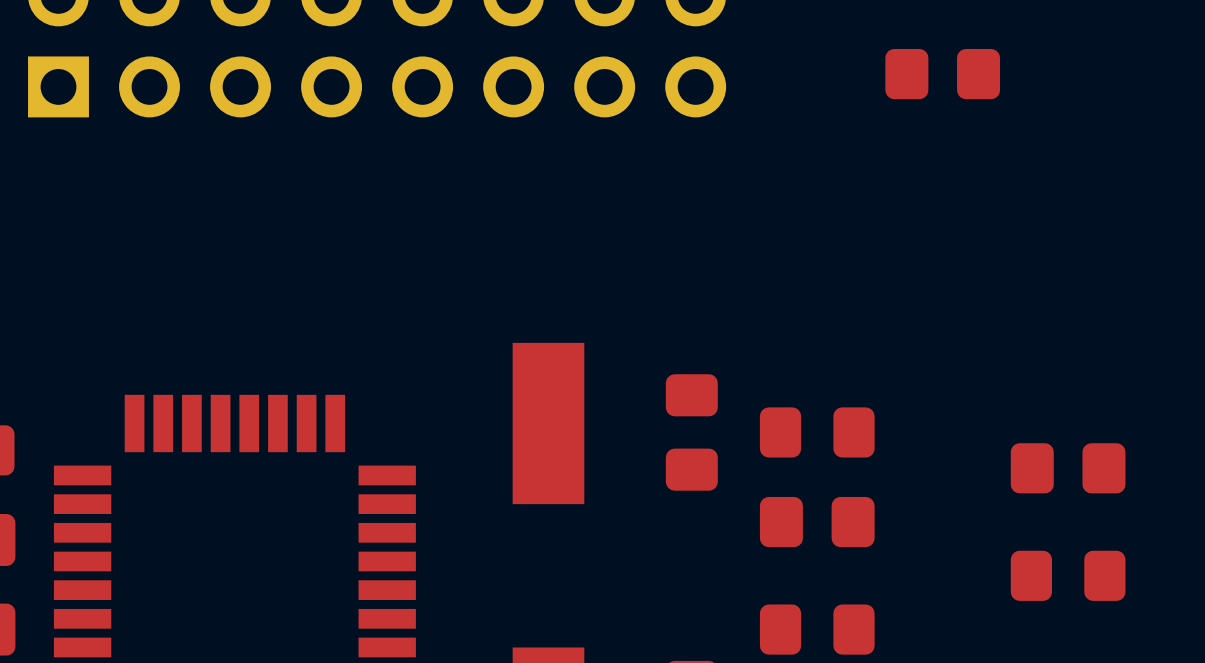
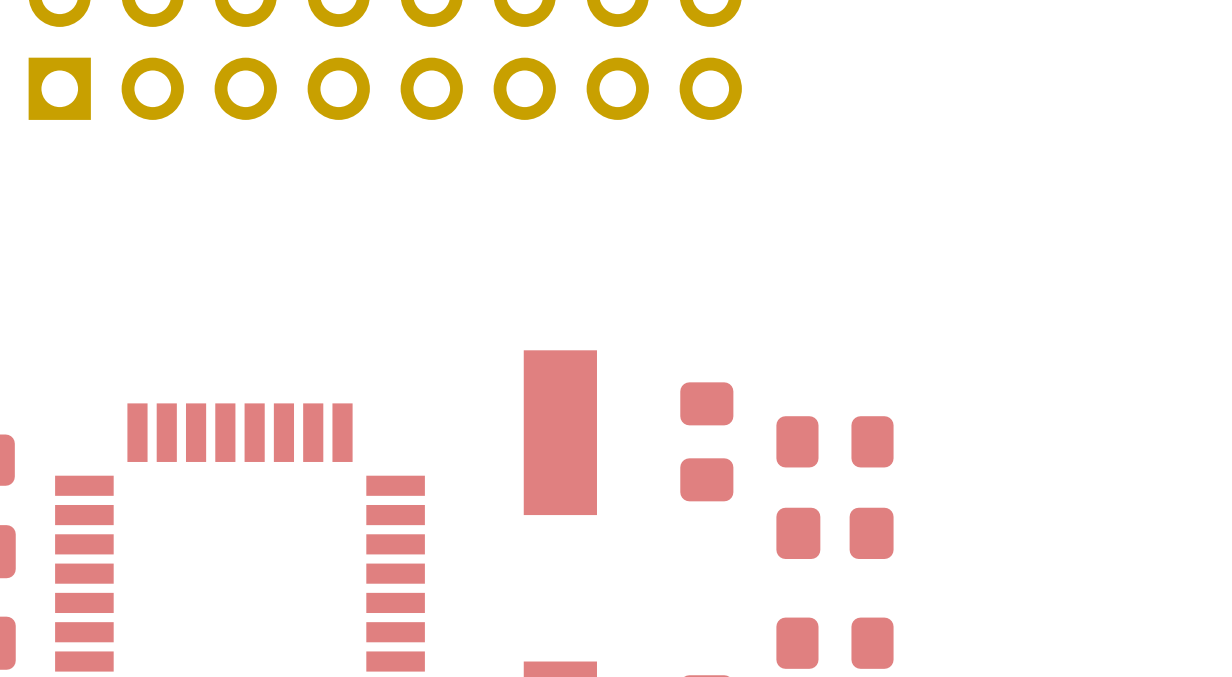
part: (942, 74) -> none
part: (1068, 468) -> none
part: (1068, 575) -> none

